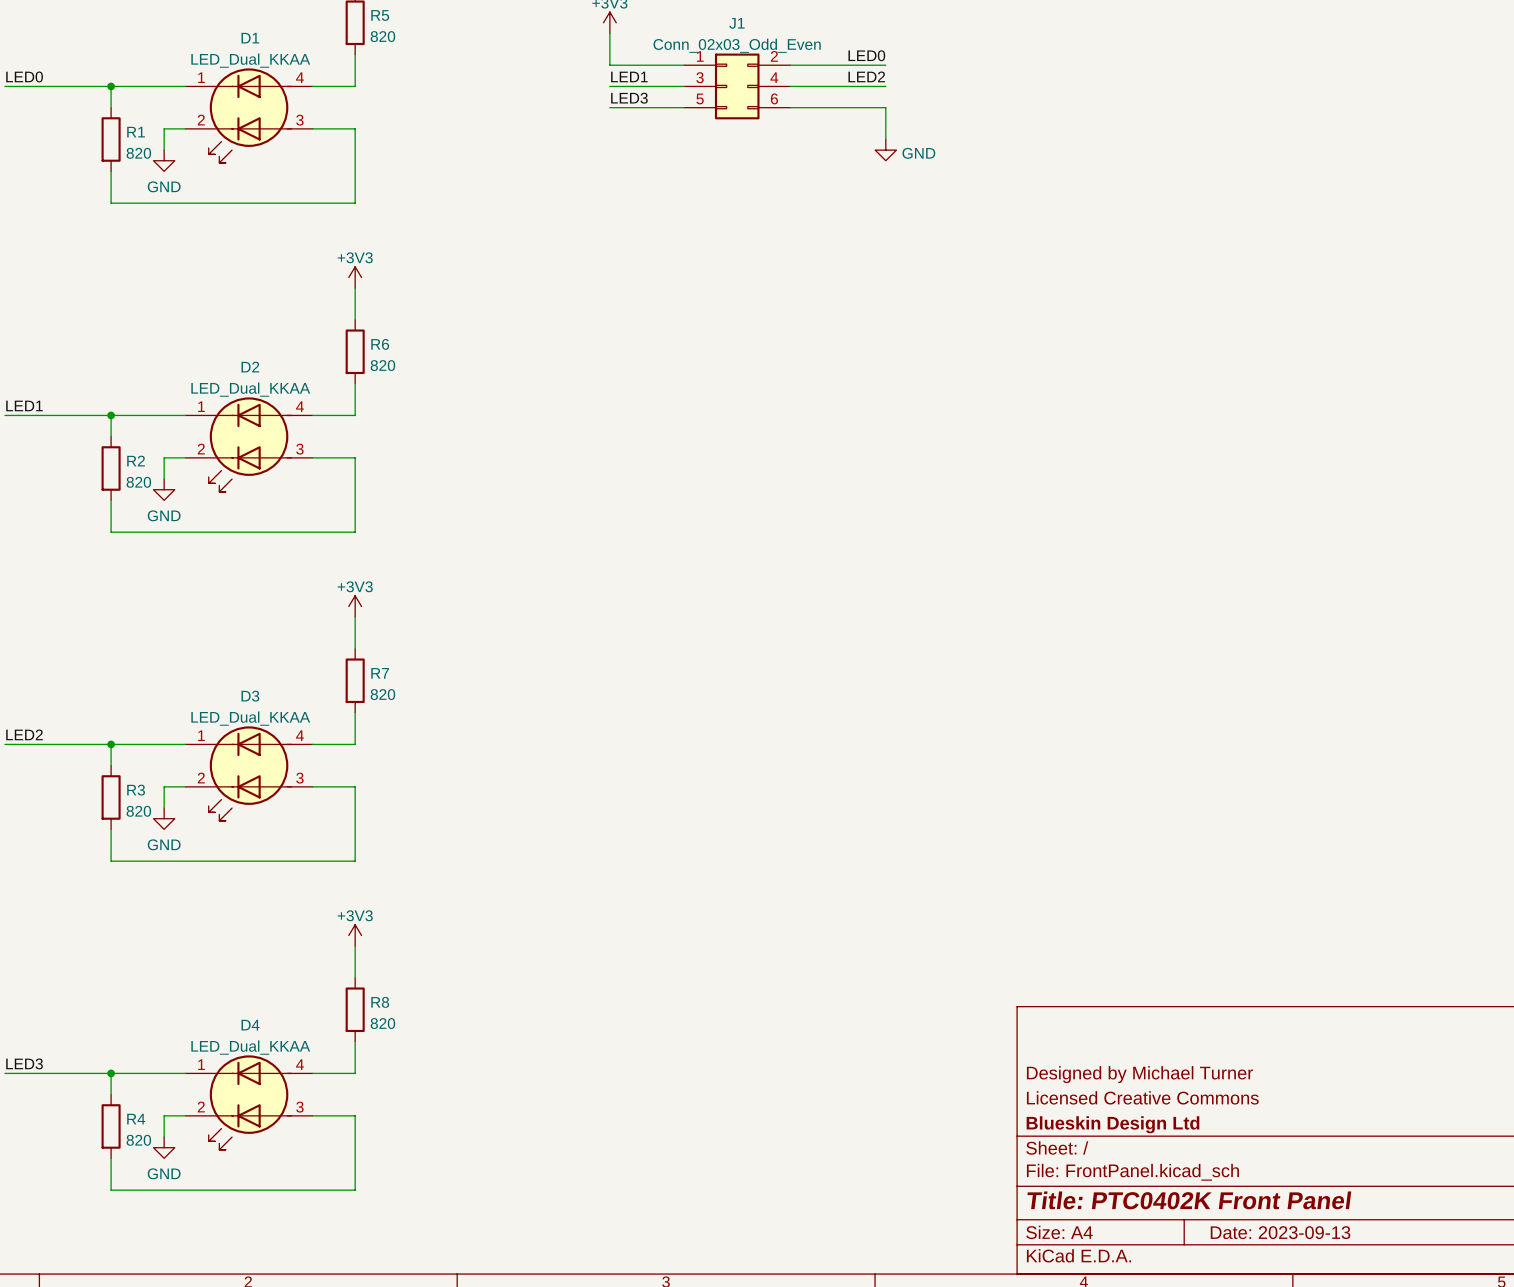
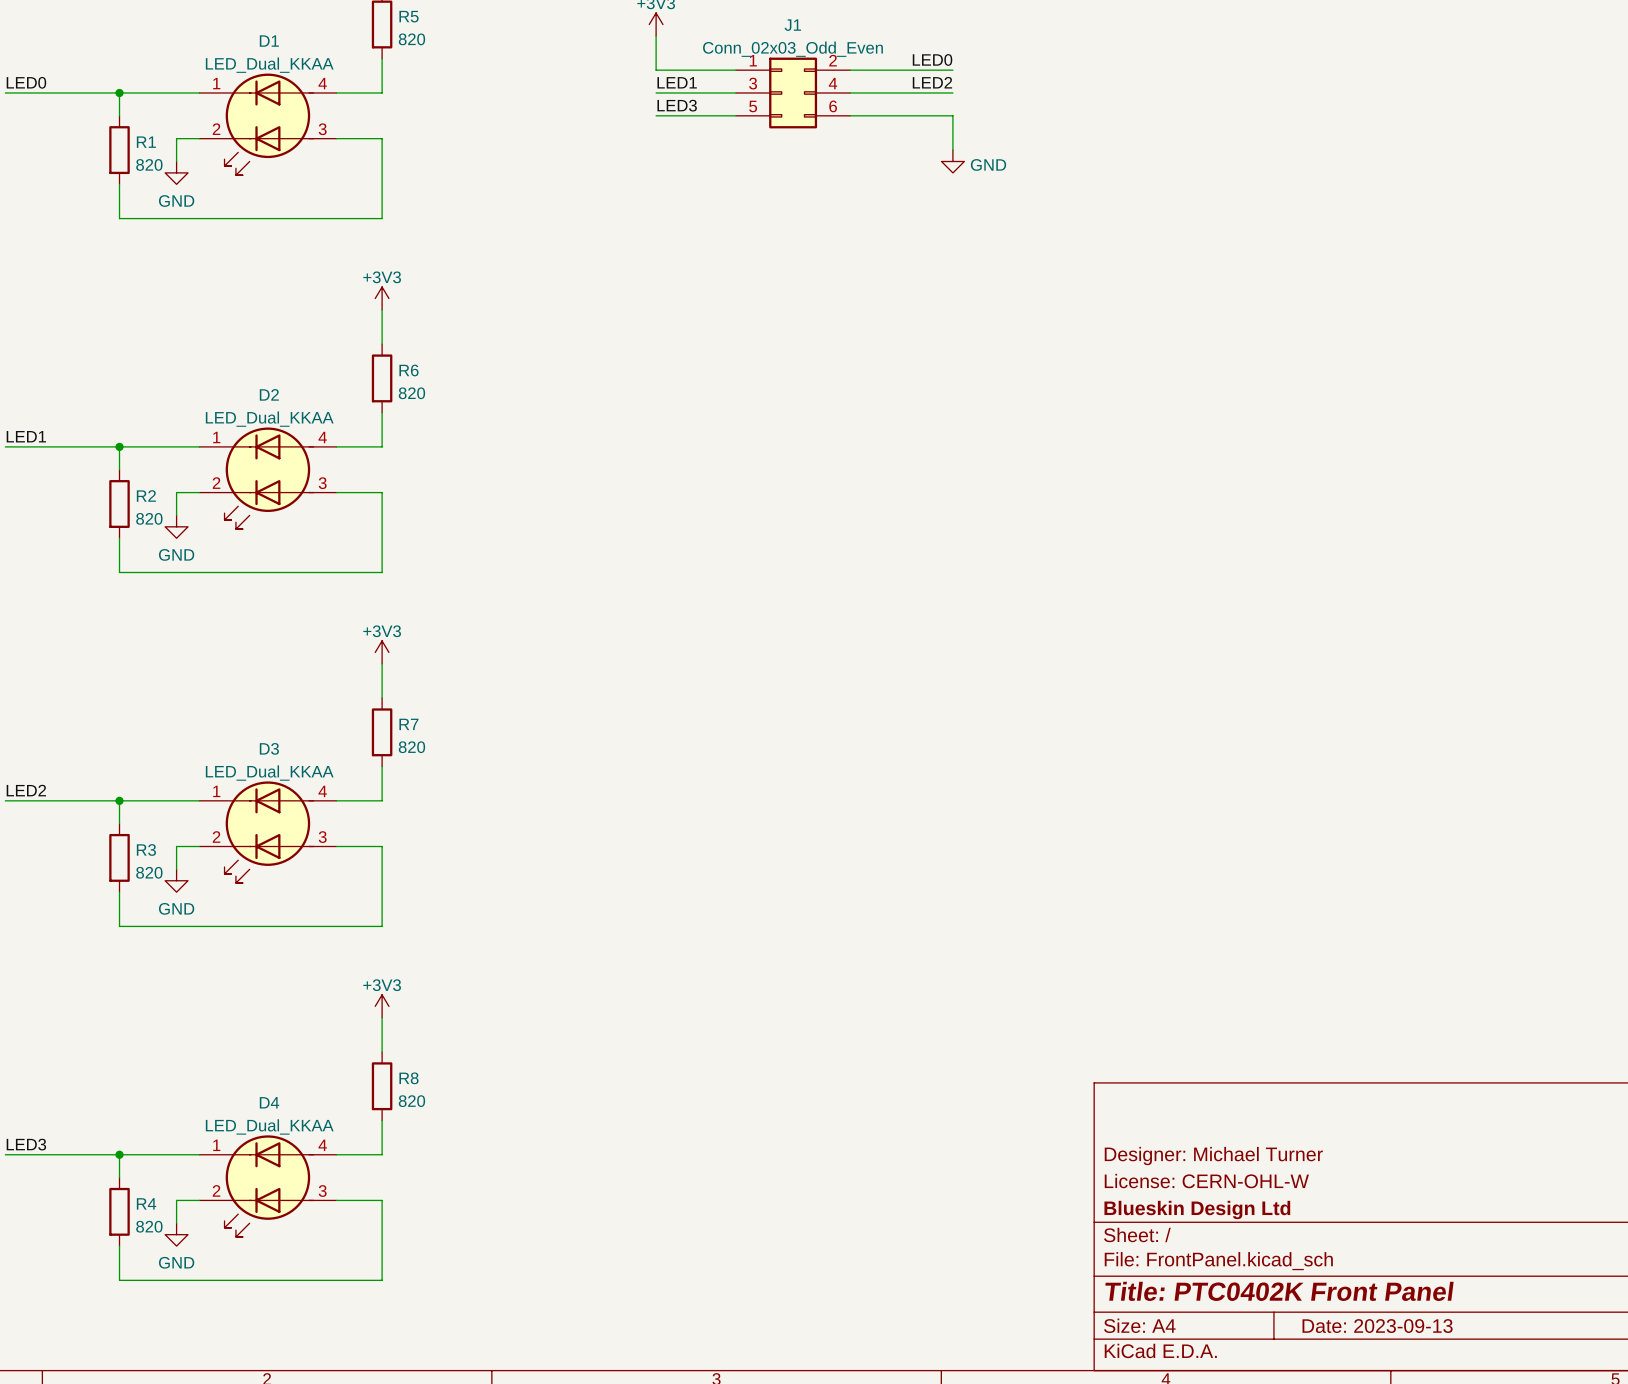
title block: Designed by Michael Turner (1139, 1074) -> Designer: Michael Turner (1213, 1156)
title block: Licensed Creative Commons (1142, 1097) -> License: CERN-OHL-W (1206, 1181)

